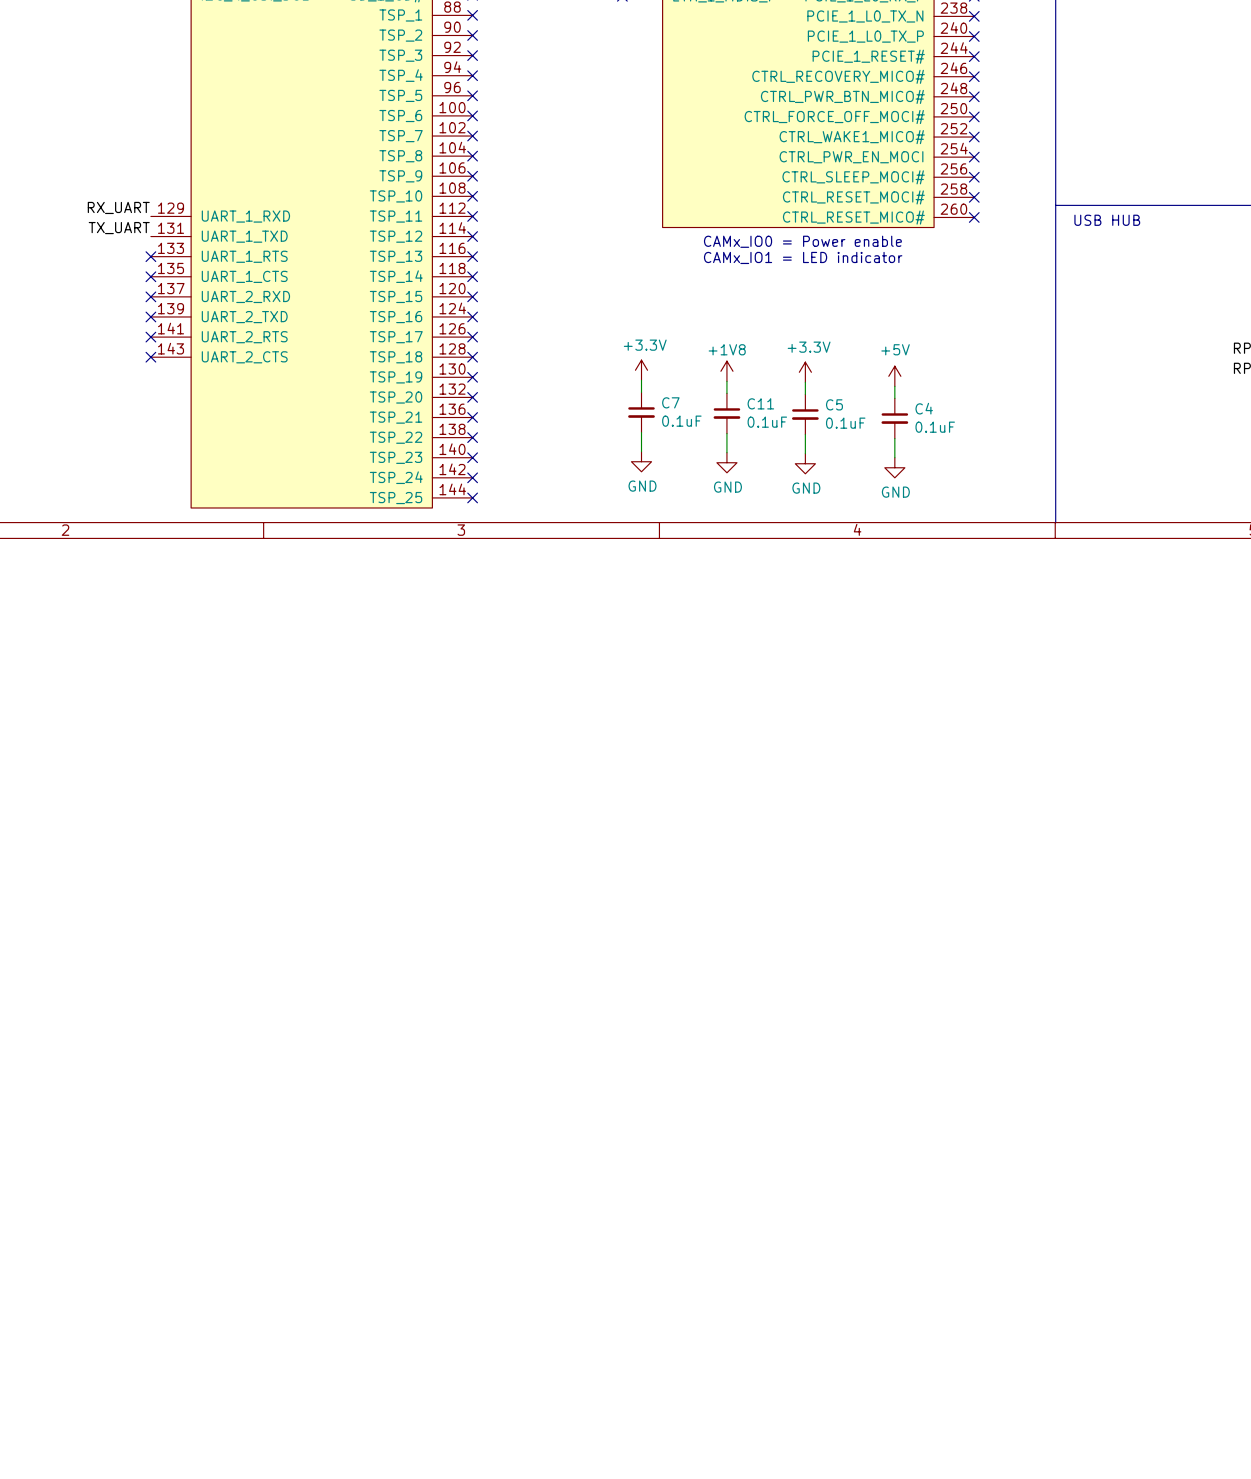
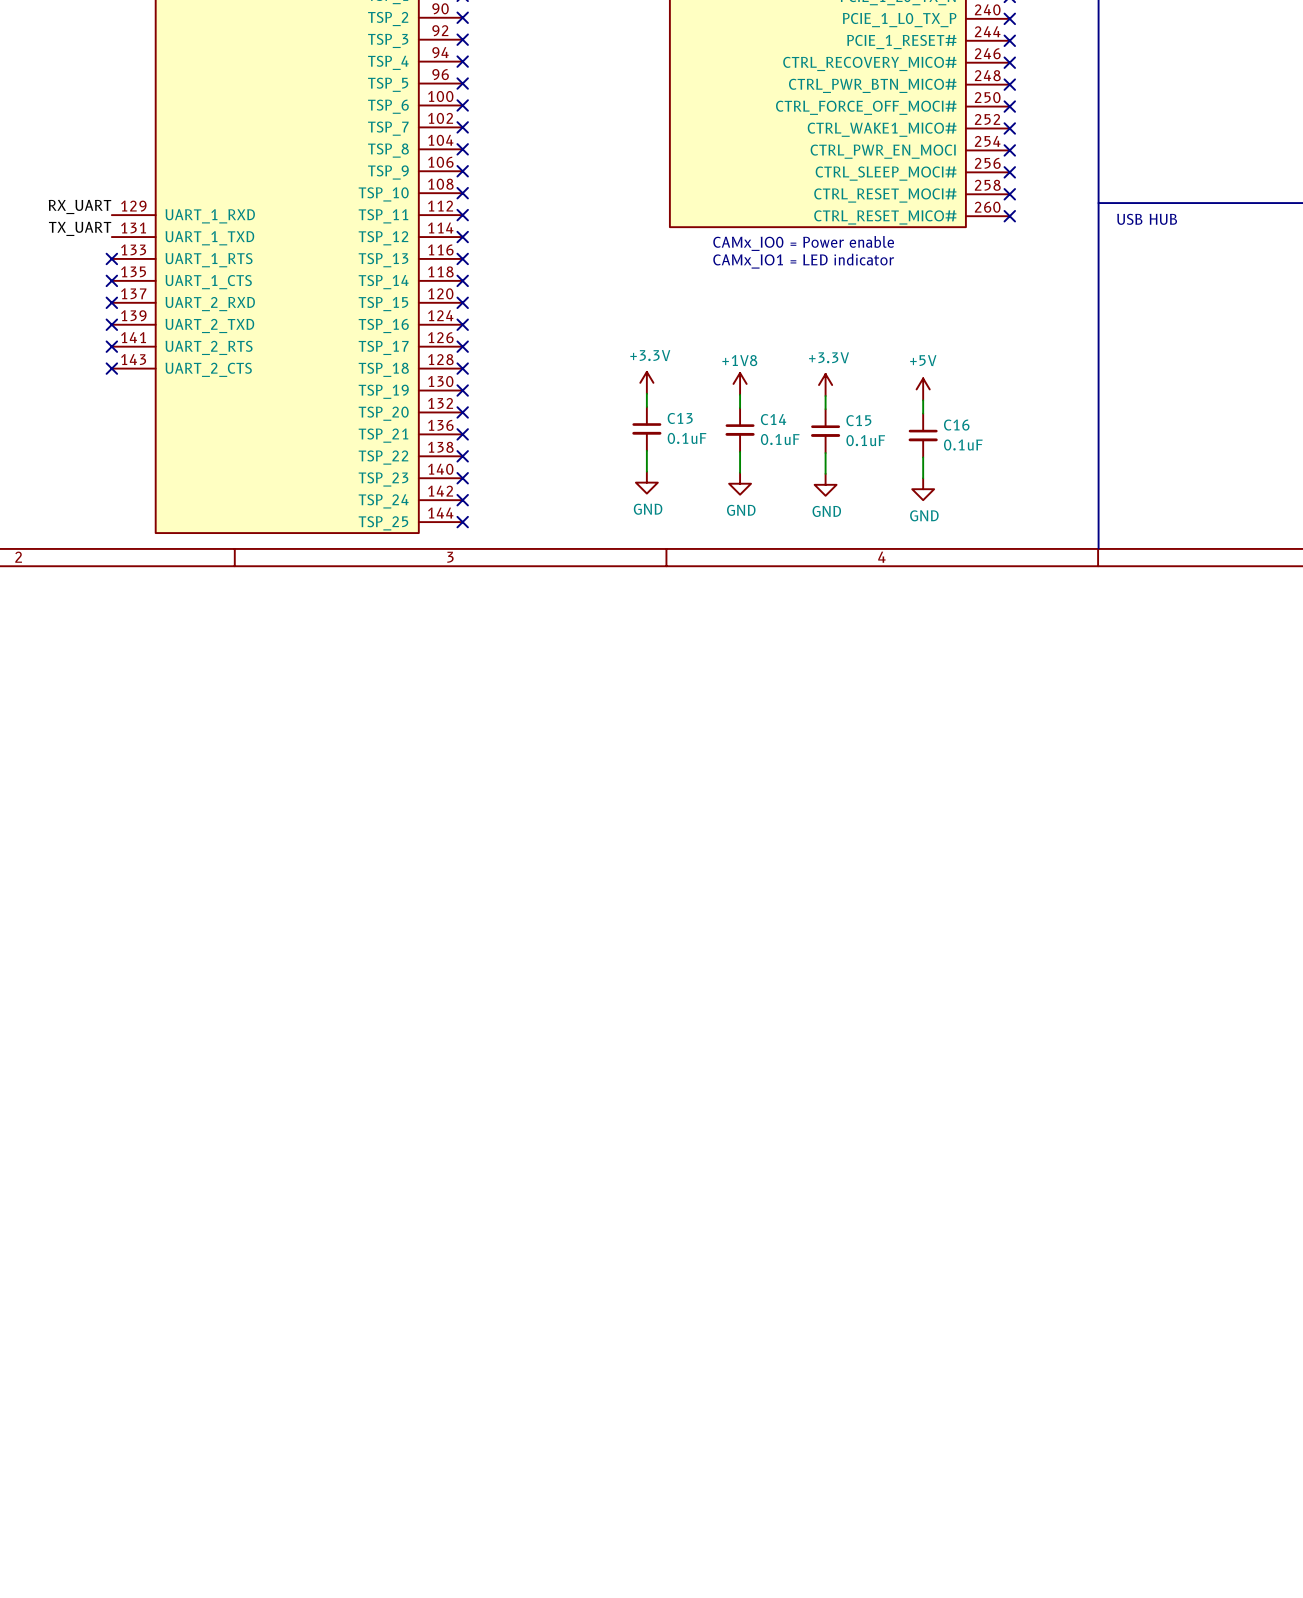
C7 name: C7 (670, 402) -> C13 (680, 418)
C11 name: C11 (760, 403) -> C14 (773, 419)
C5 name: C5 (834, 404) -> C15 (858, 420)
C4 name: C4 (924, 408) -> C16 (956, 425)

